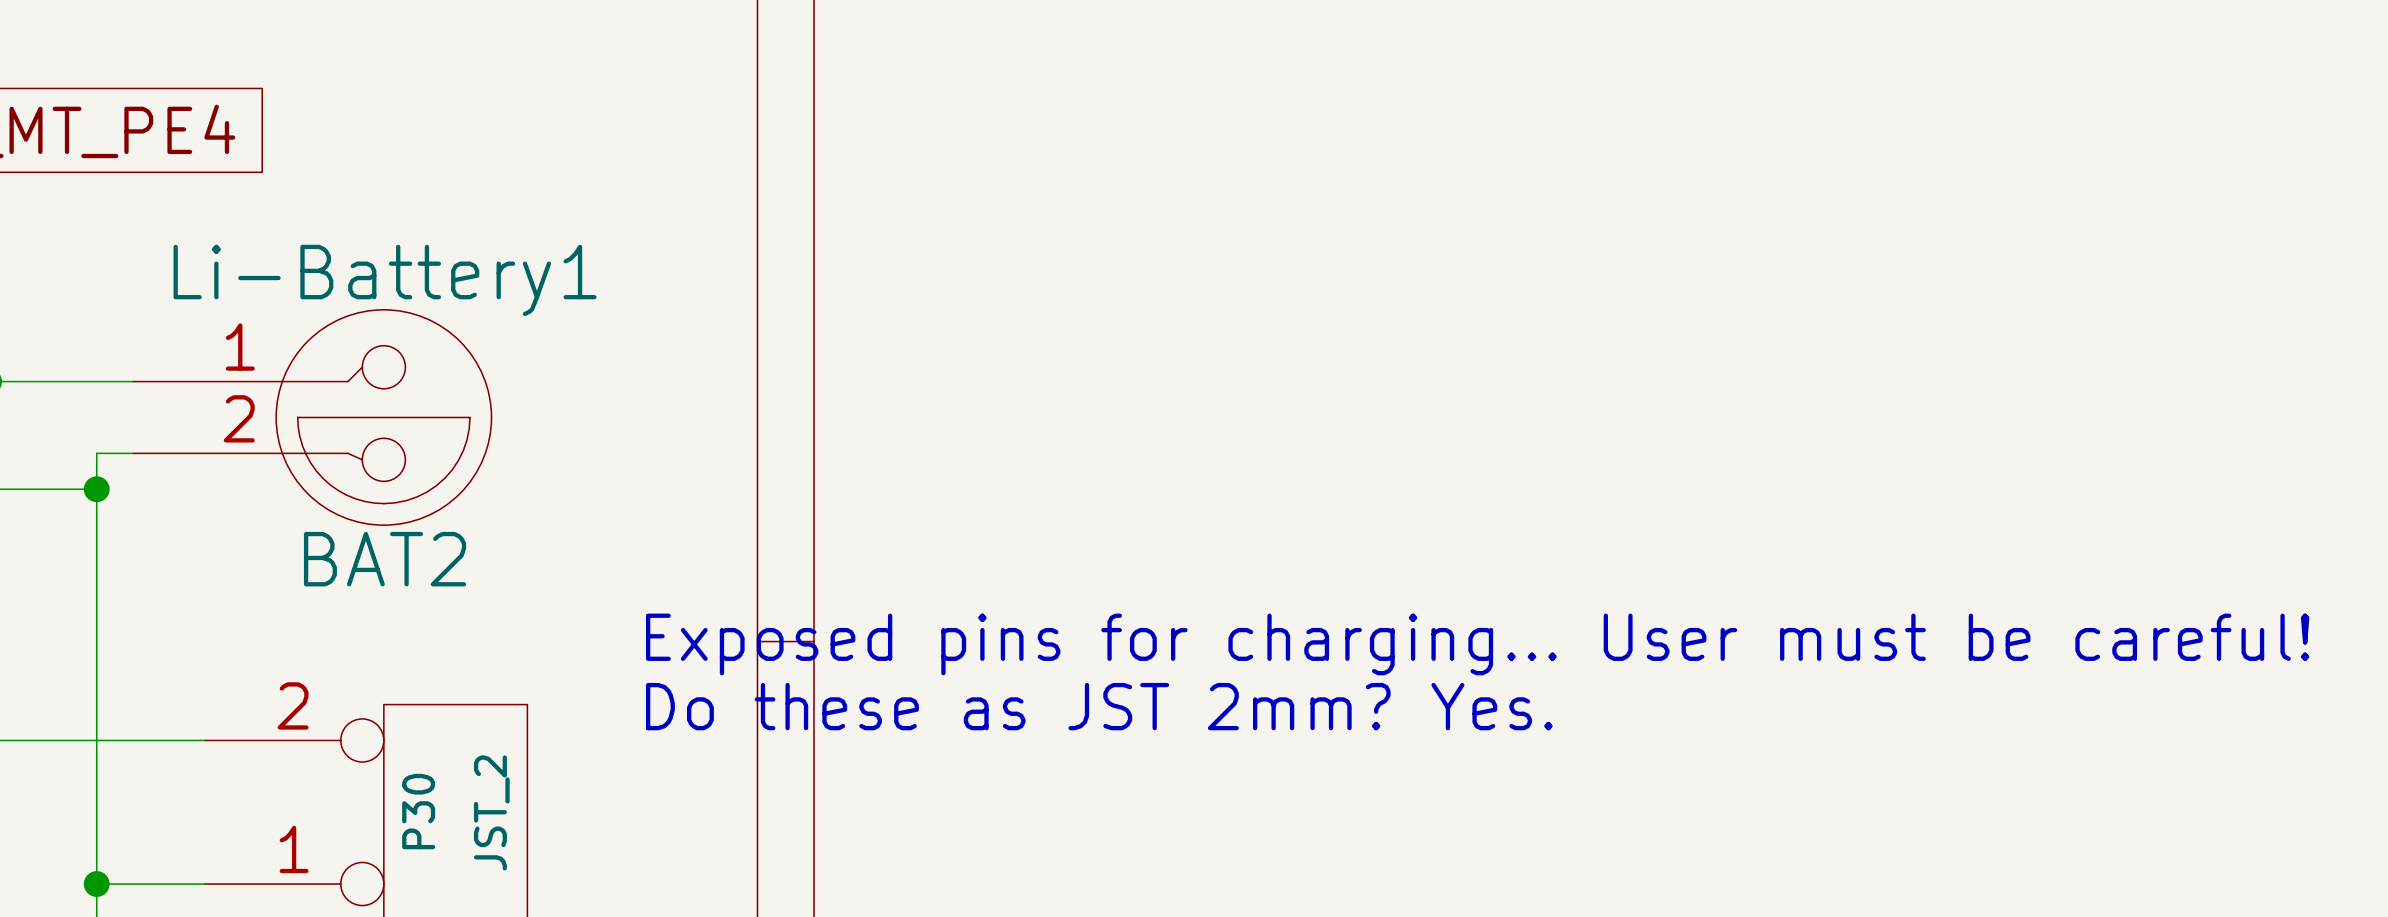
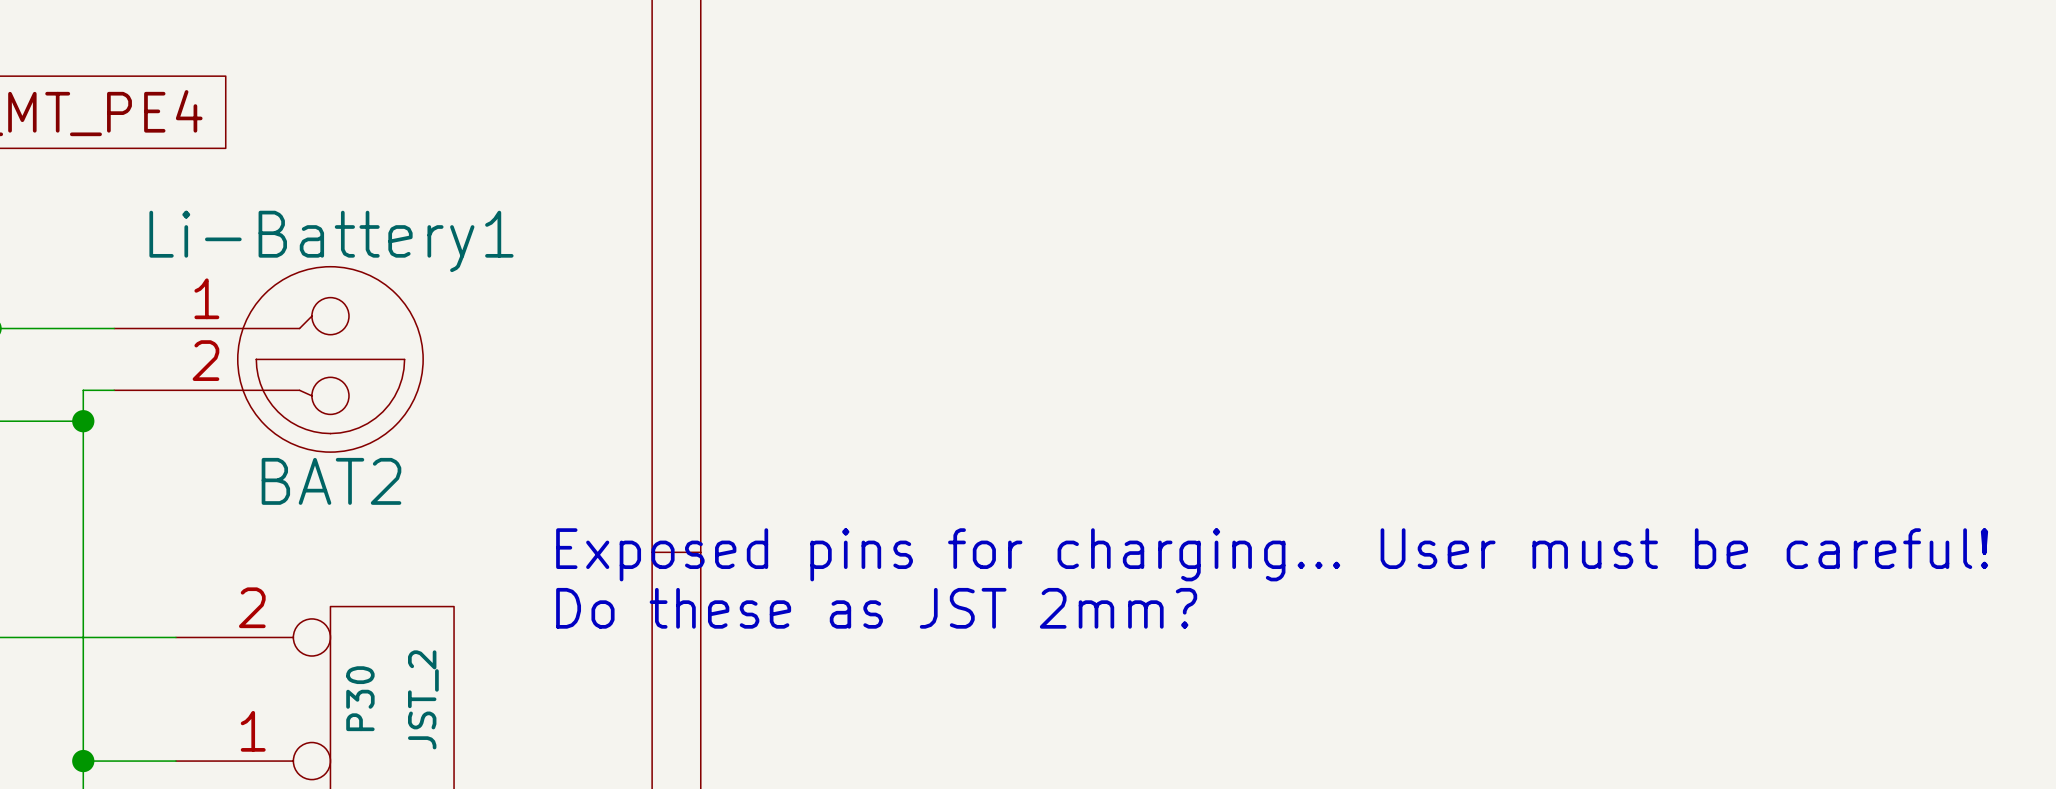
text: Do these as JST 2mm? Yes. (1099, 706) -> Do these as JST 2mm? (876, 608)

